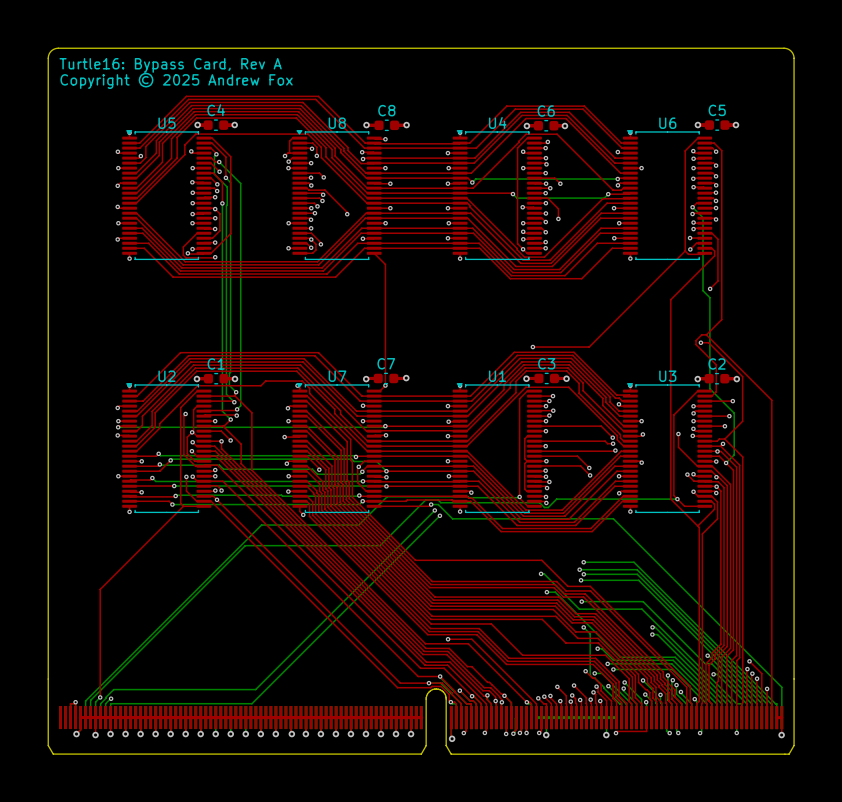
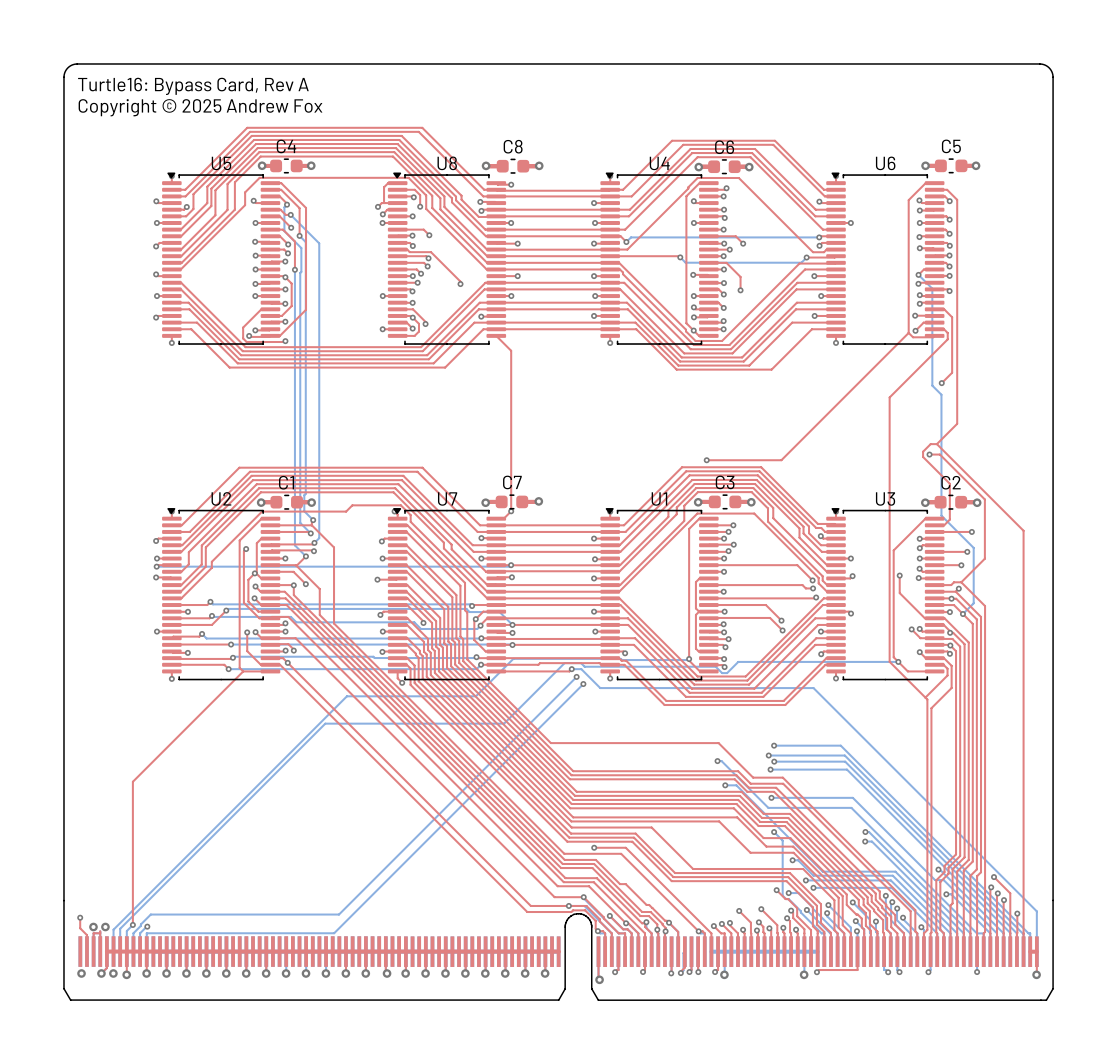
top track: none -> (80, 917) (80, 928) (86, 935) (86, 951)
via: none -> (93, 927)
via: none -> (105, 927)
via position: (75, 702) -> (80, 917)
via: none -> (81, 973)
via: none -> (113, 973)

